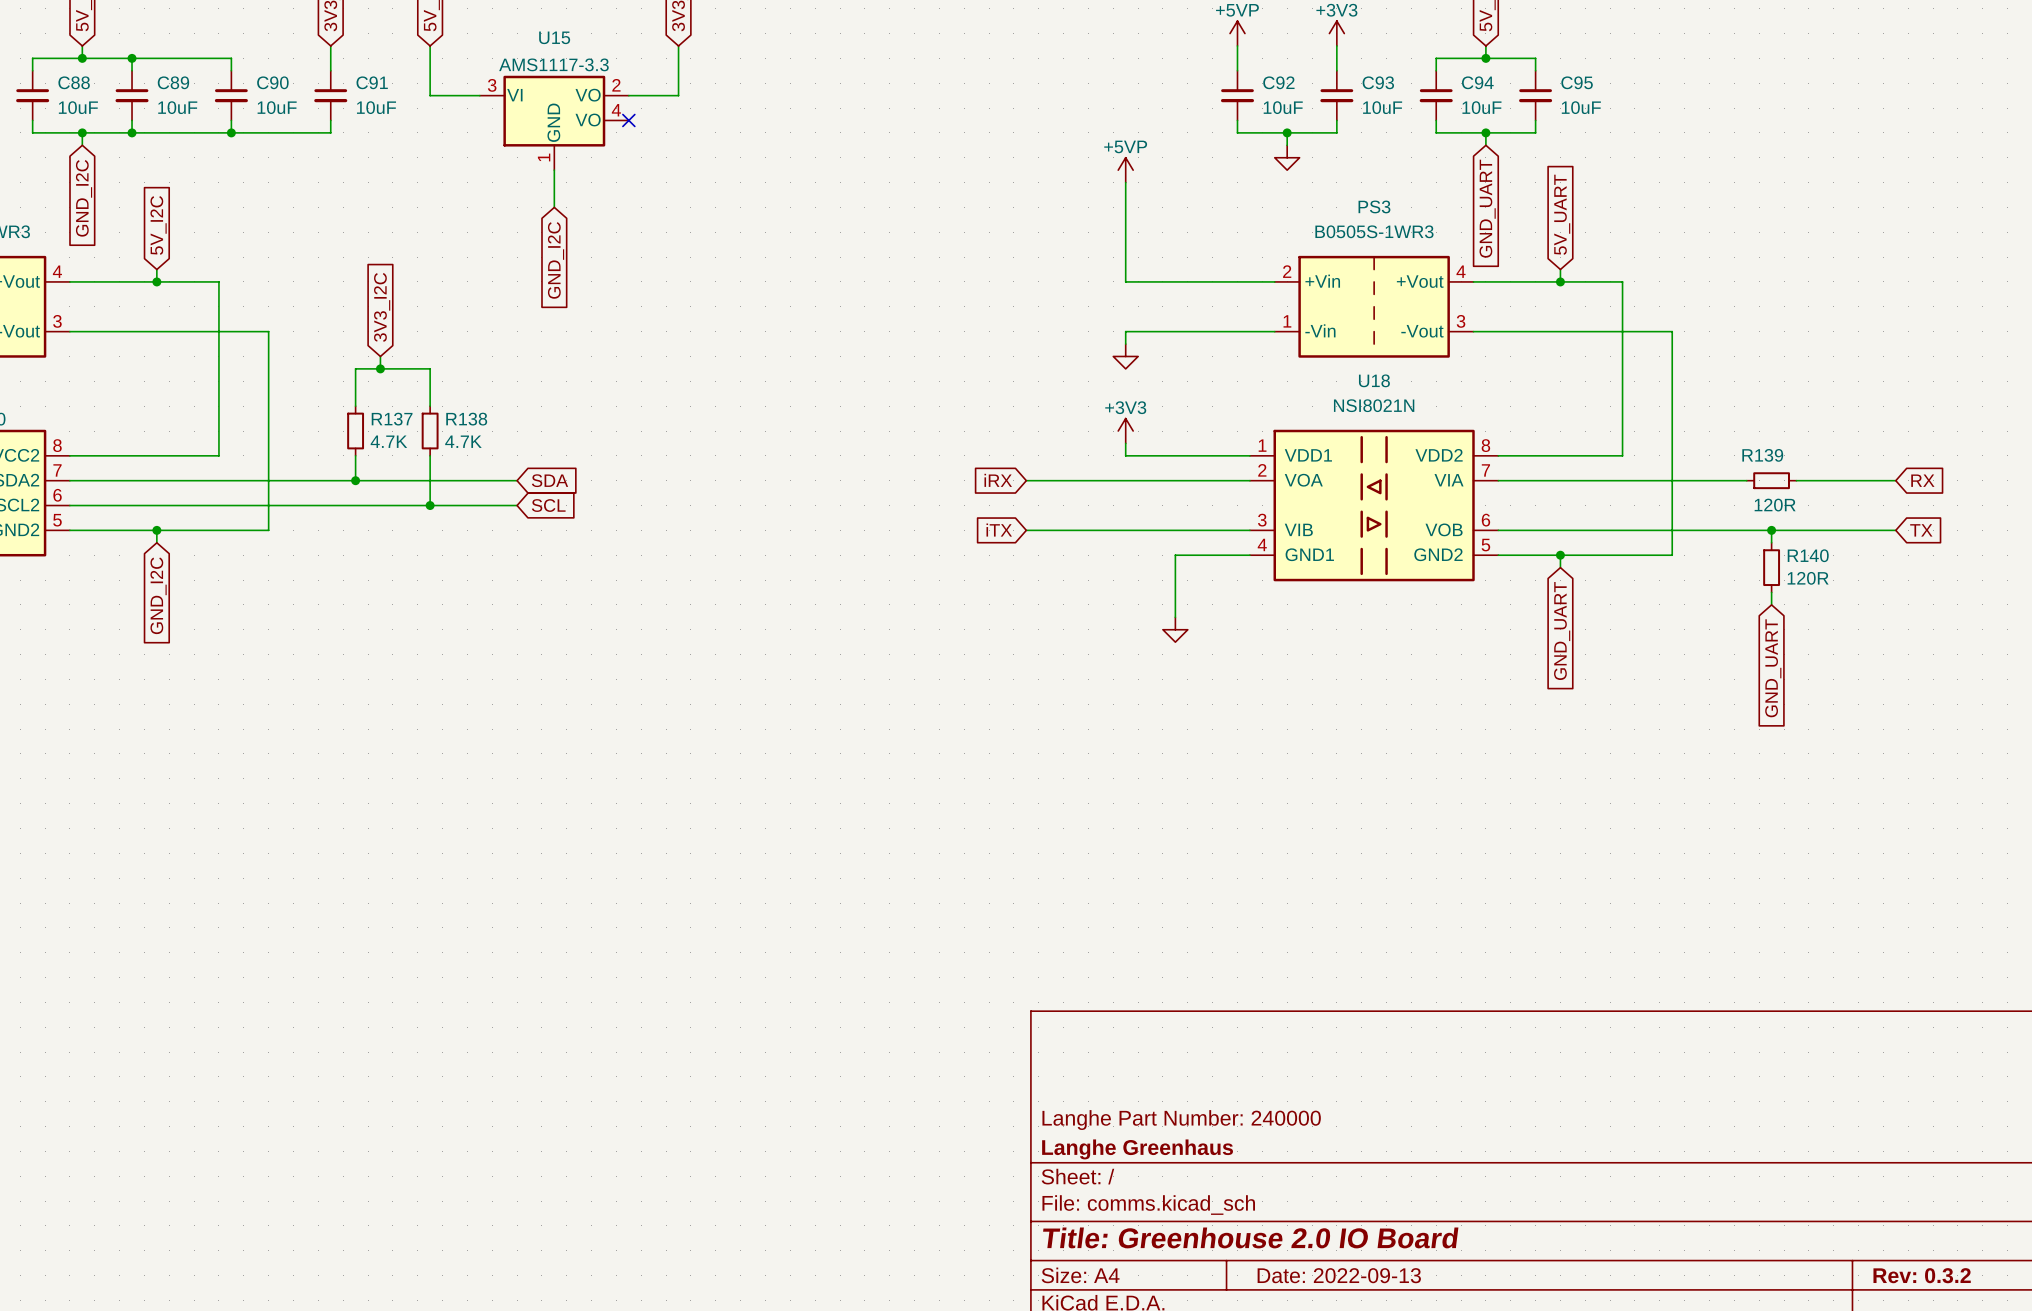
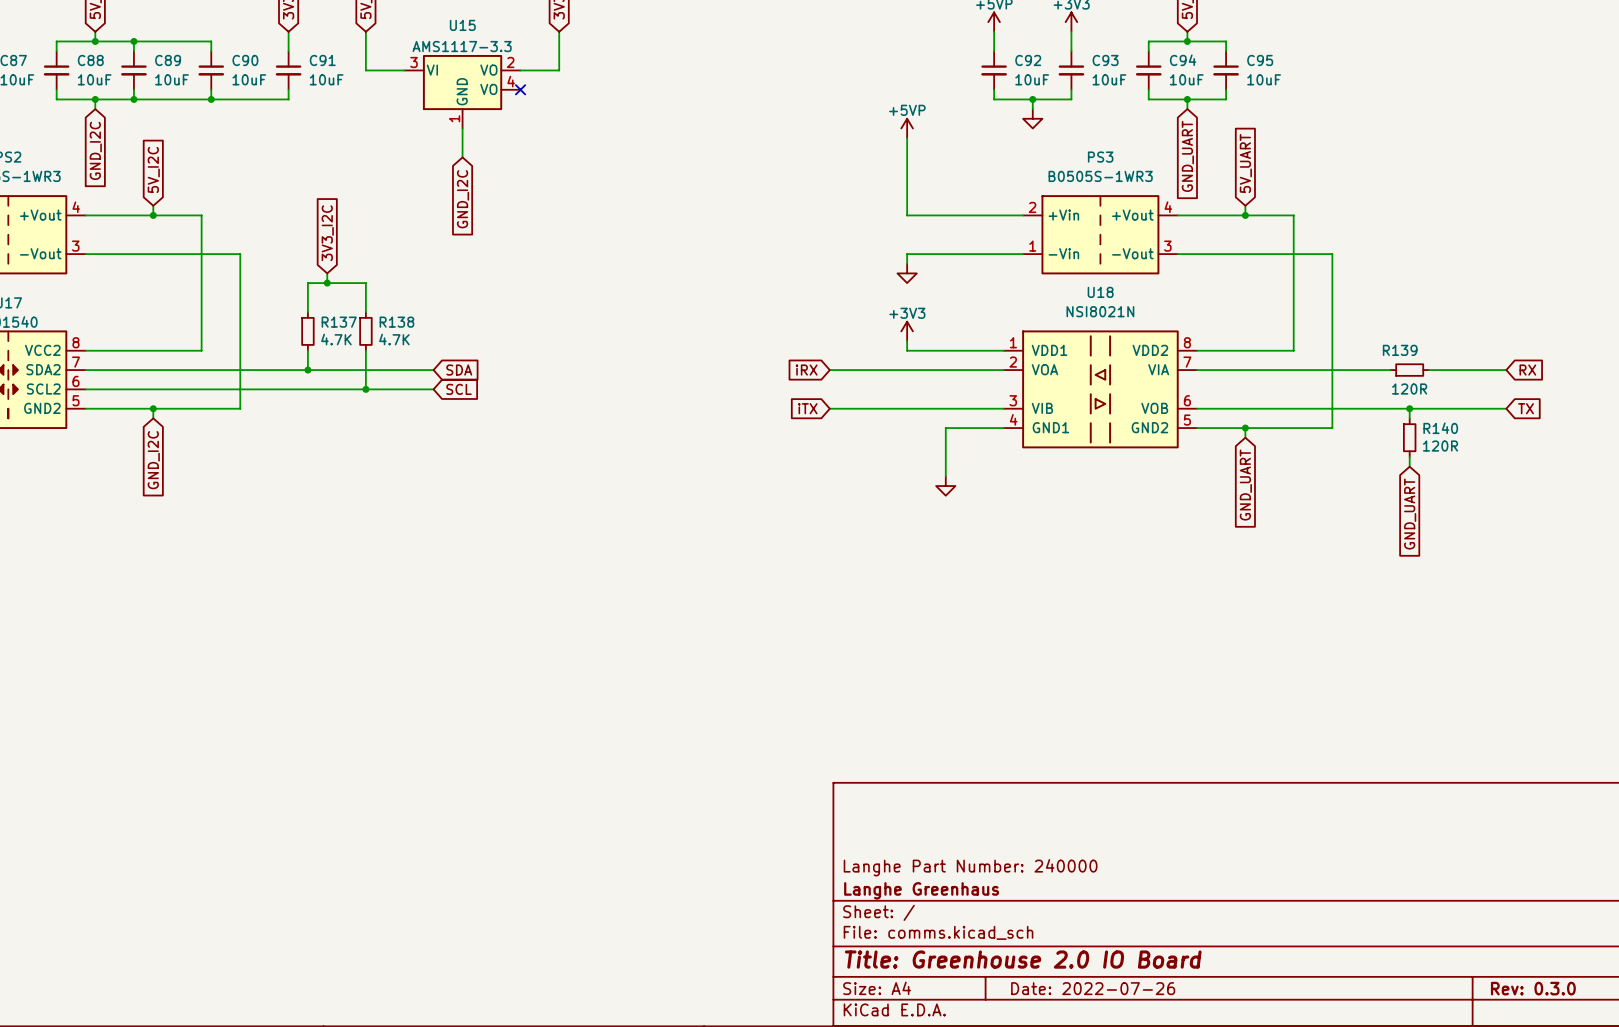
title block: Date: 2022-09-13 (1339, 1275) -> Date: 2022-07-26 (1093, 988)
title block: Rev: 0.3.2 (1922, 1275) -> Rev: 0.3.0 (1533, 988)

